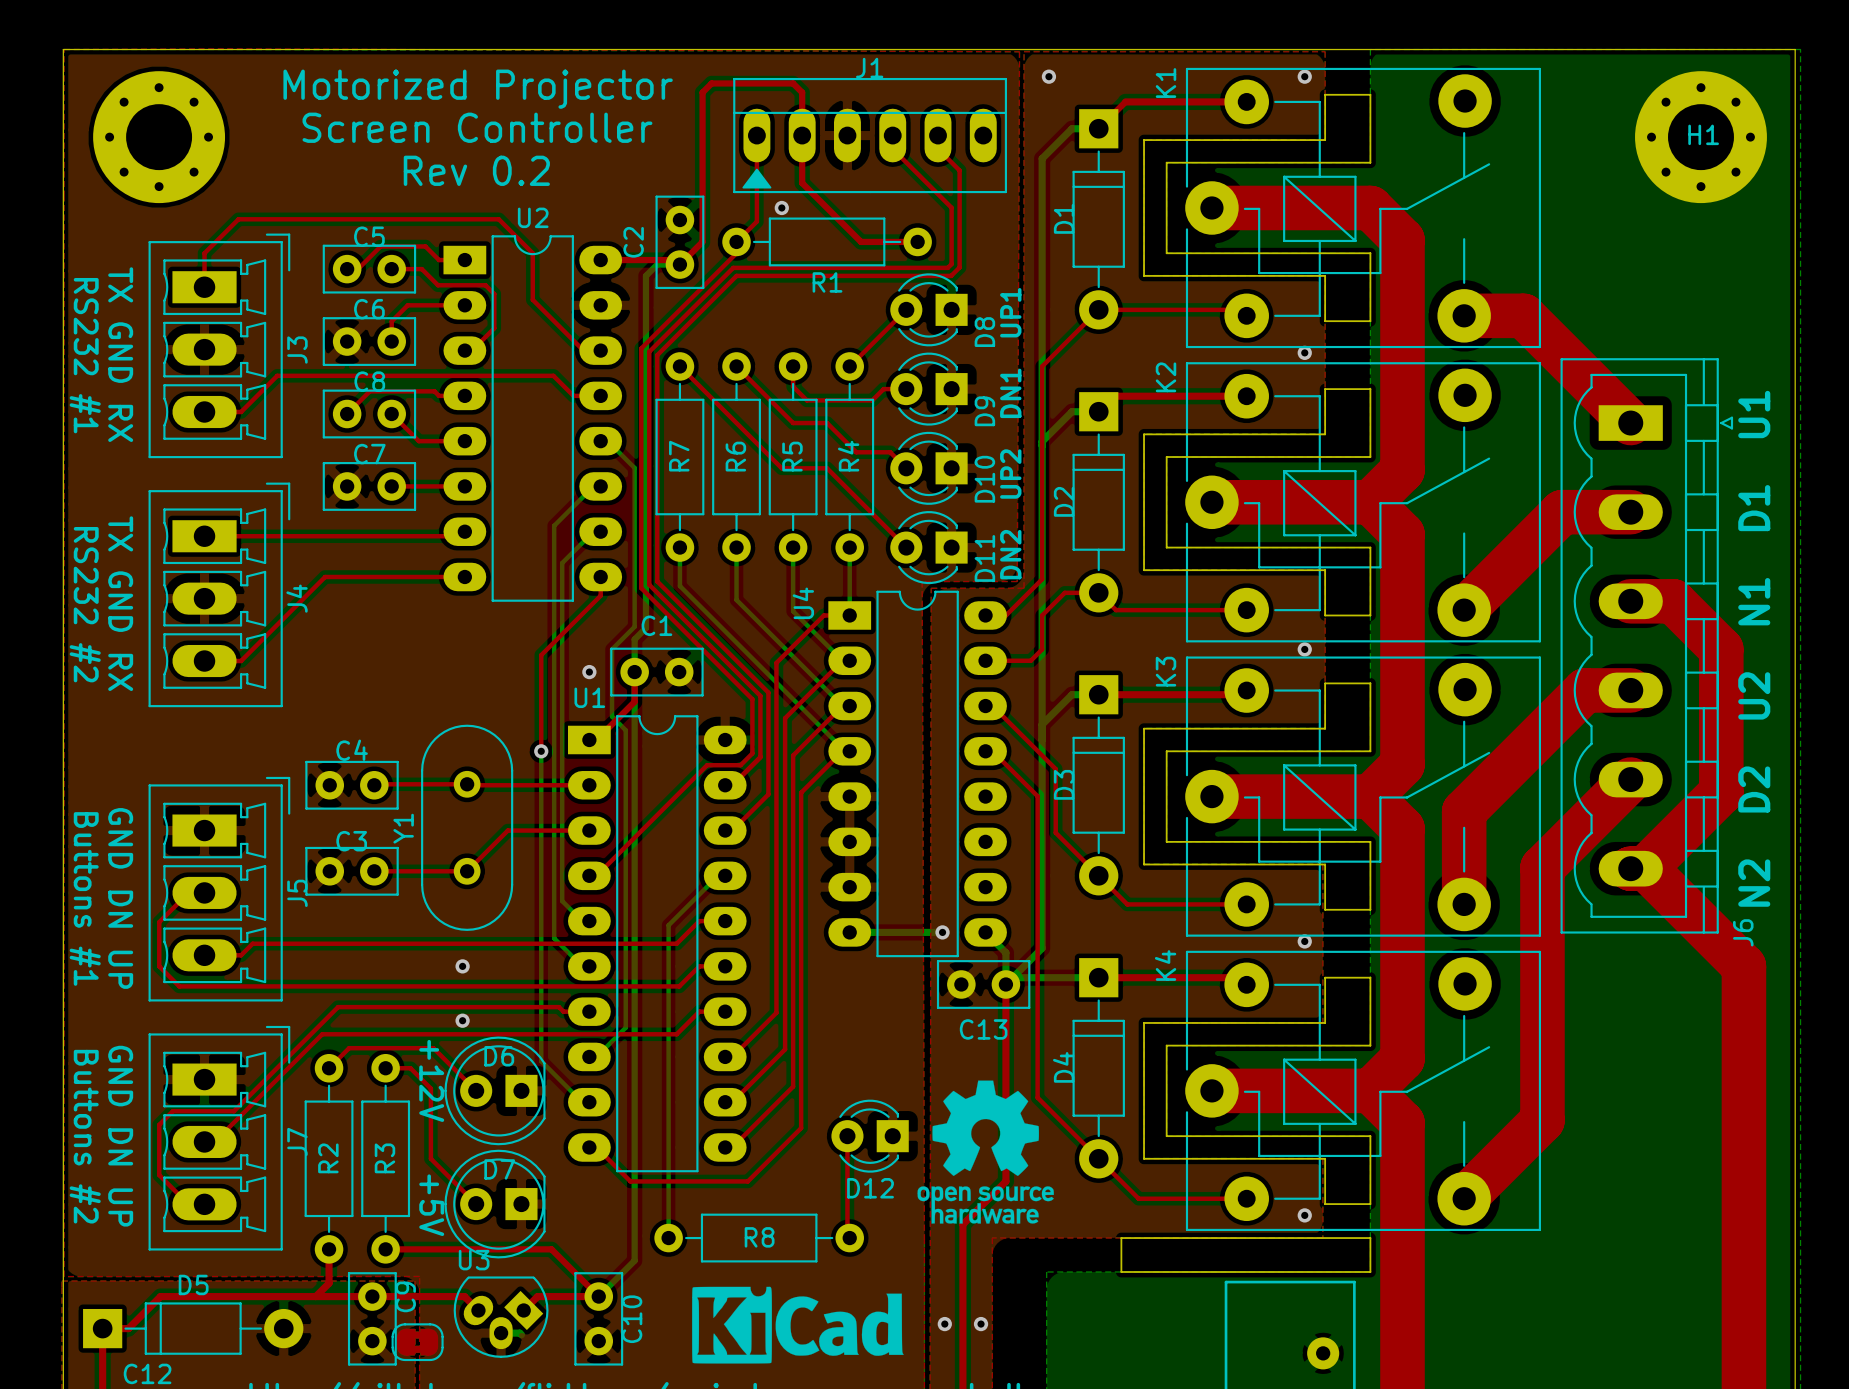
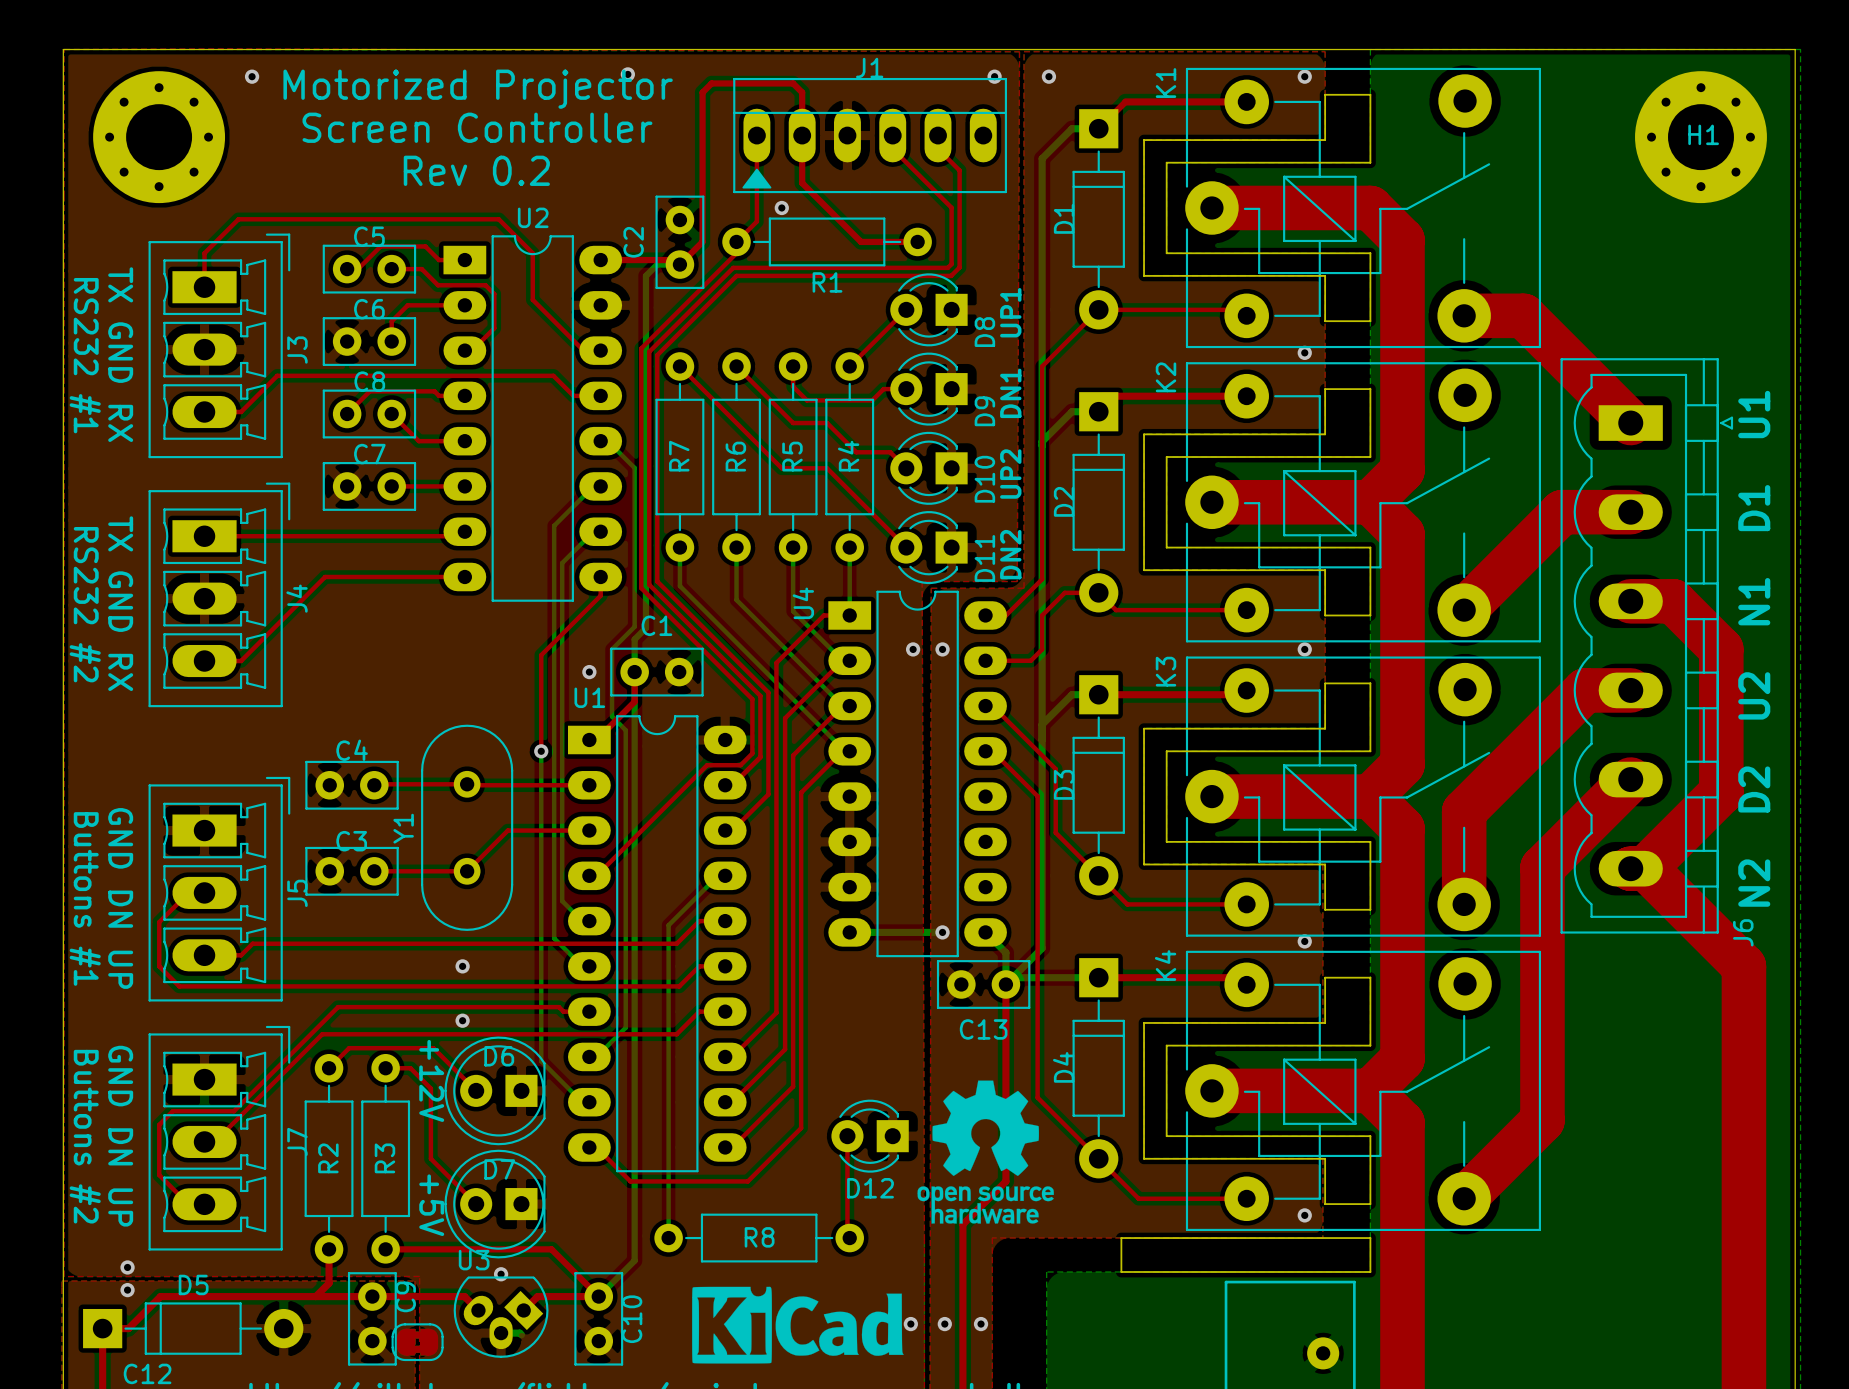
via: none -> (627, 74)
via: none -> (252, 76)
via: none -> (994, 76)
via: none -> (913, 649)
via: none -> (942, 649)
via: none -> (127, 1267)
via: none -> (501, 1274)
via: none -> (127, 1290)
via: none -> (910, 1324)

